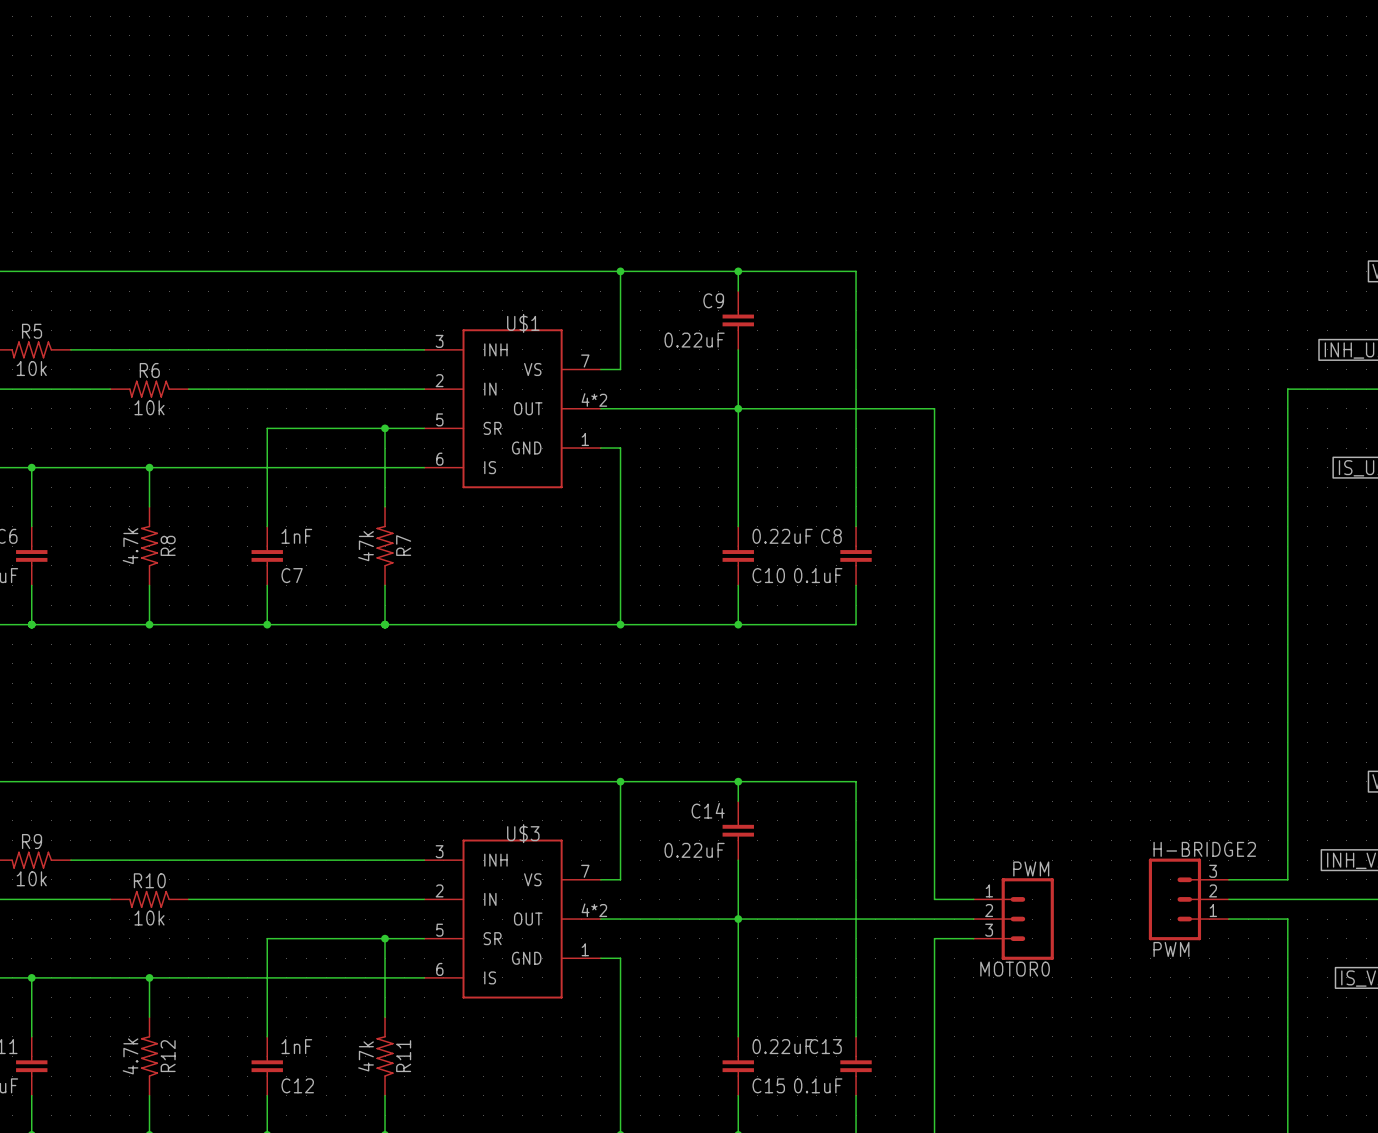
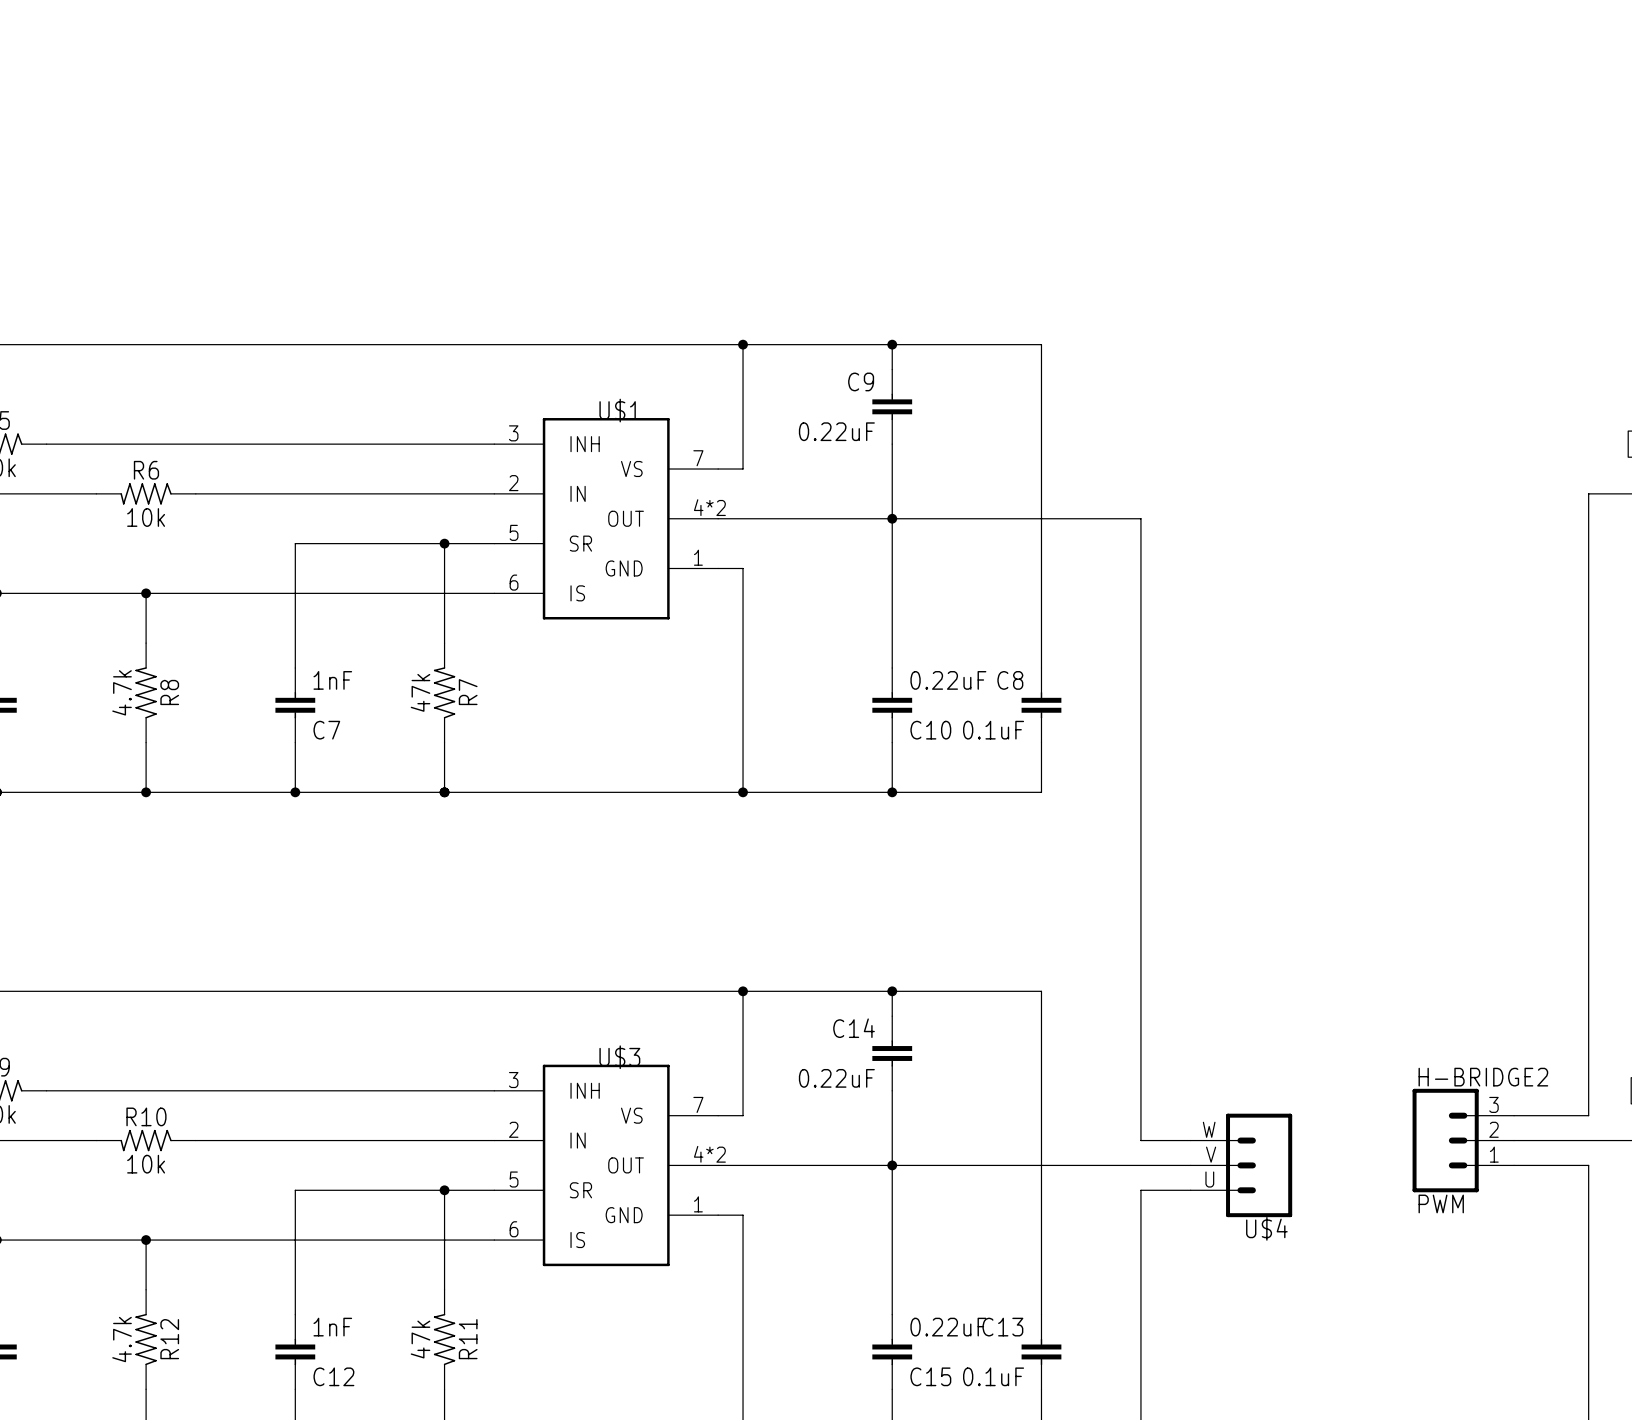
MOTOR0 value: PWM (1031, 868) -> none
MOTOR0 pin number: 1 (989, 890) -> W (1209, 1129)
MOTOR0 pin number: 2 (989, 910) -> V (1211, 1154)
MOTOR0 pin number: 3 (989, 930) -> U (1209, 1179)
MOTOR0 name: MOTOR0 (1015, 969) -> U$4 (1266, 1228)

